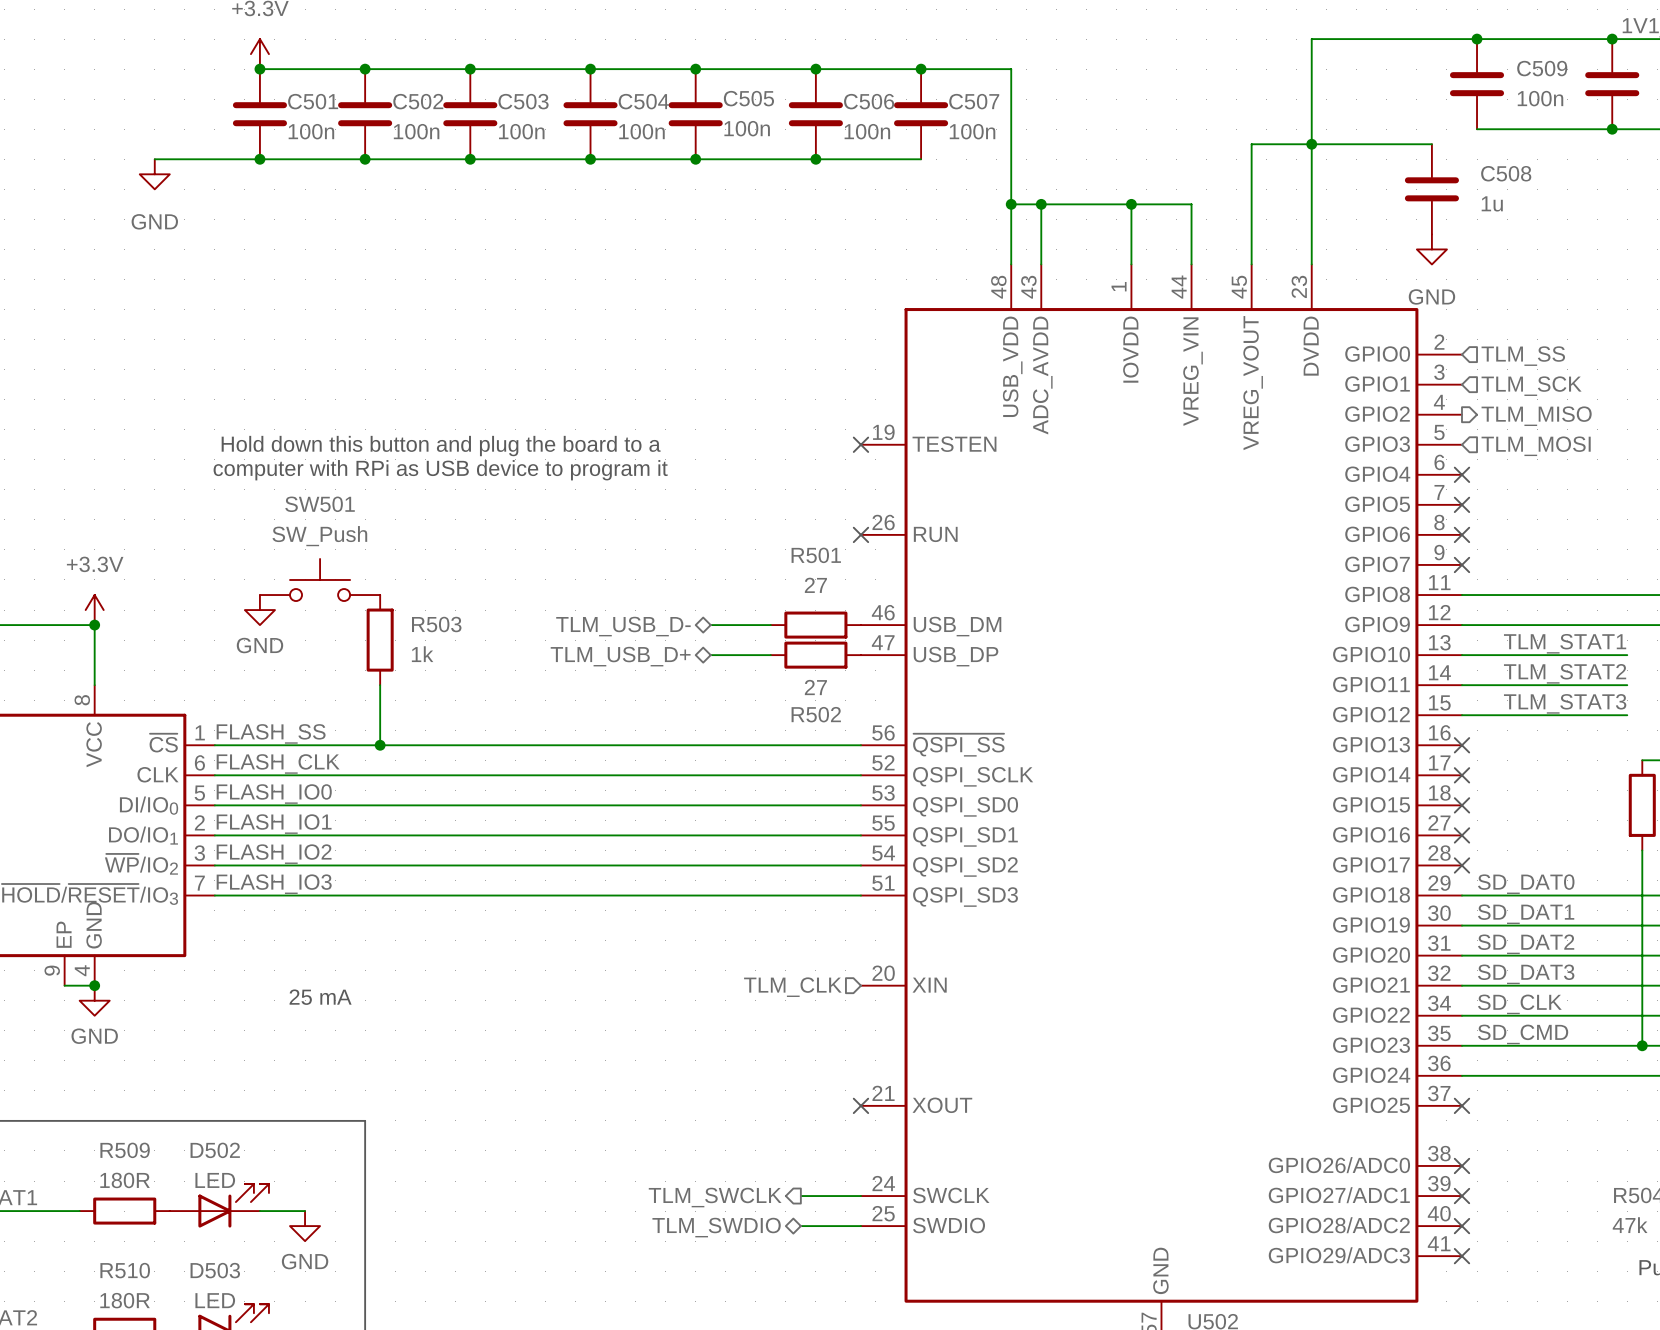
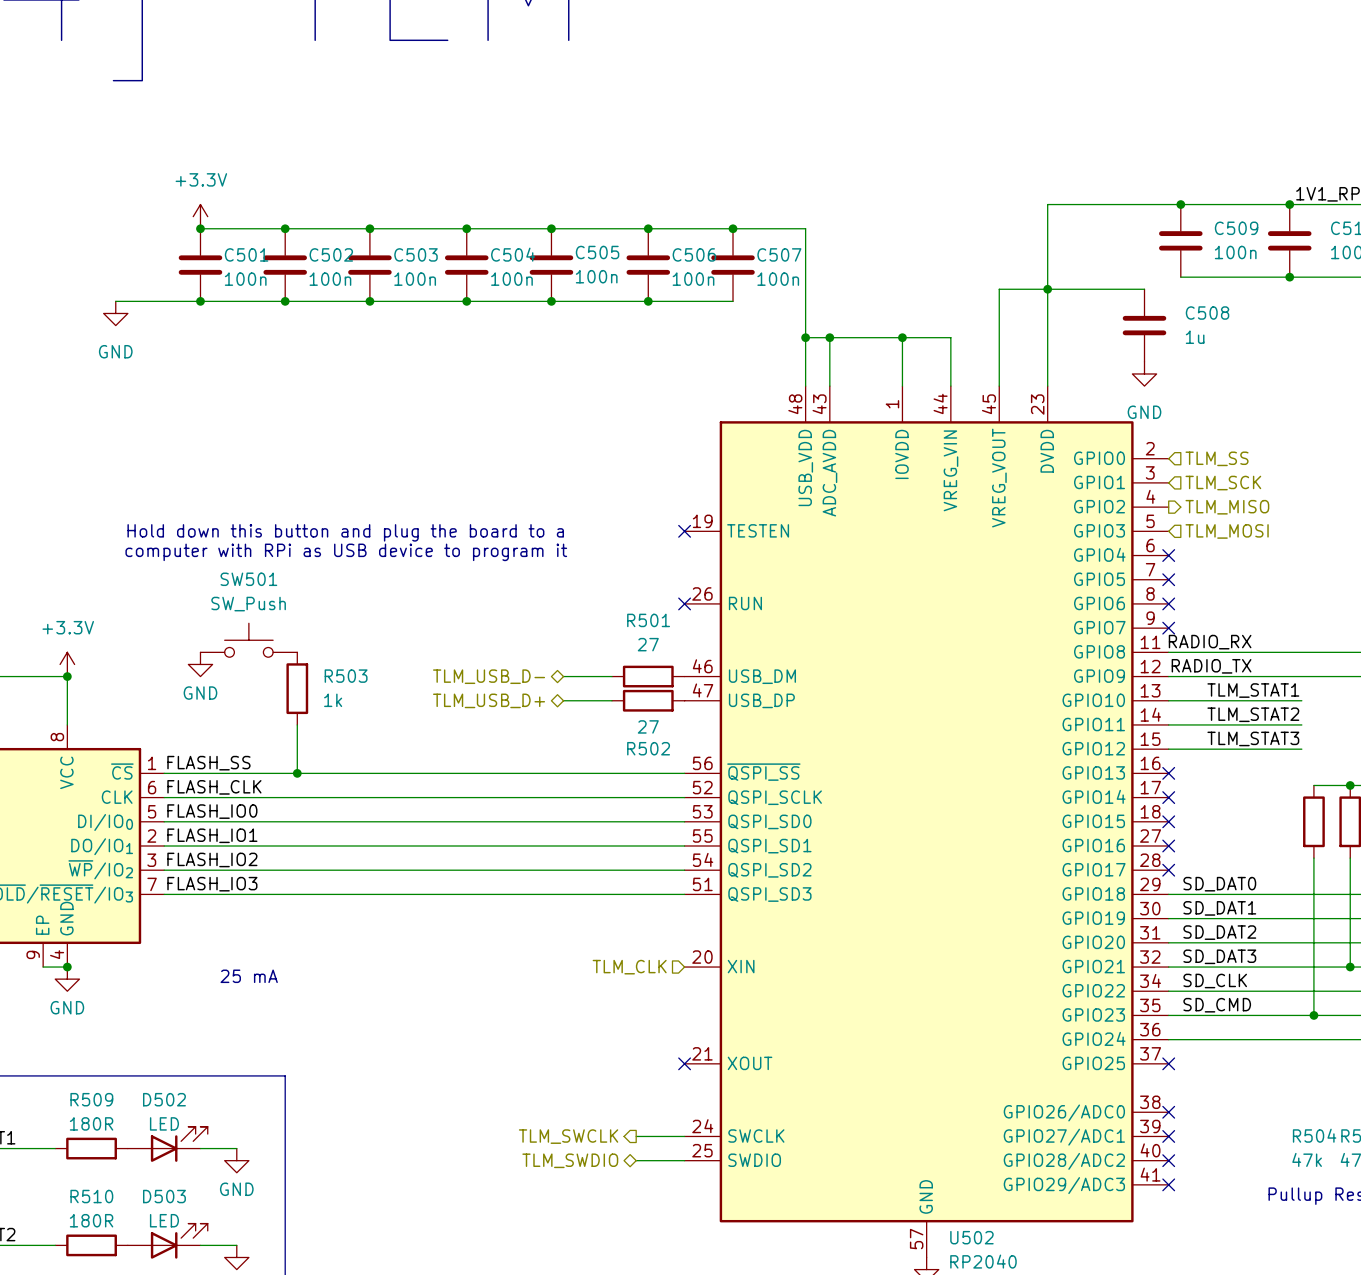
label: none -> RADIO_RX (1210, 642)
label: none -> RADIO_TX (1211, 666)

